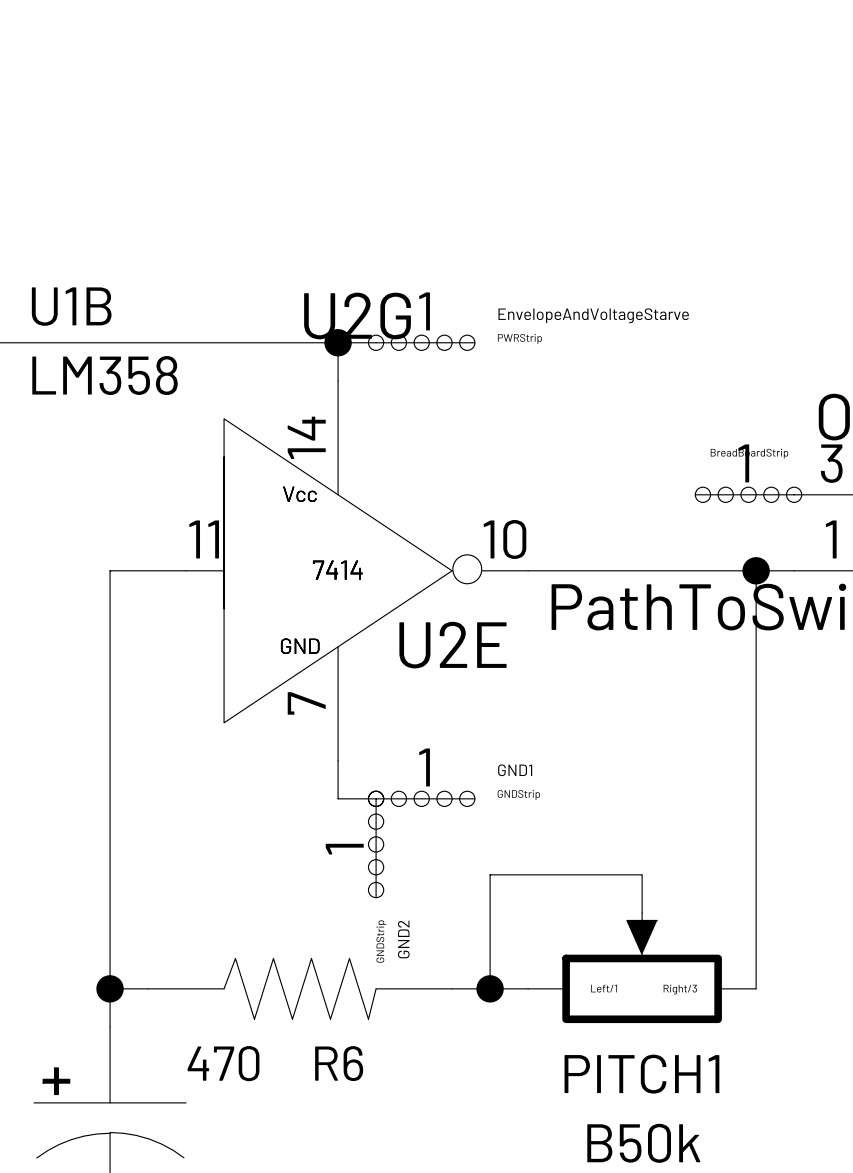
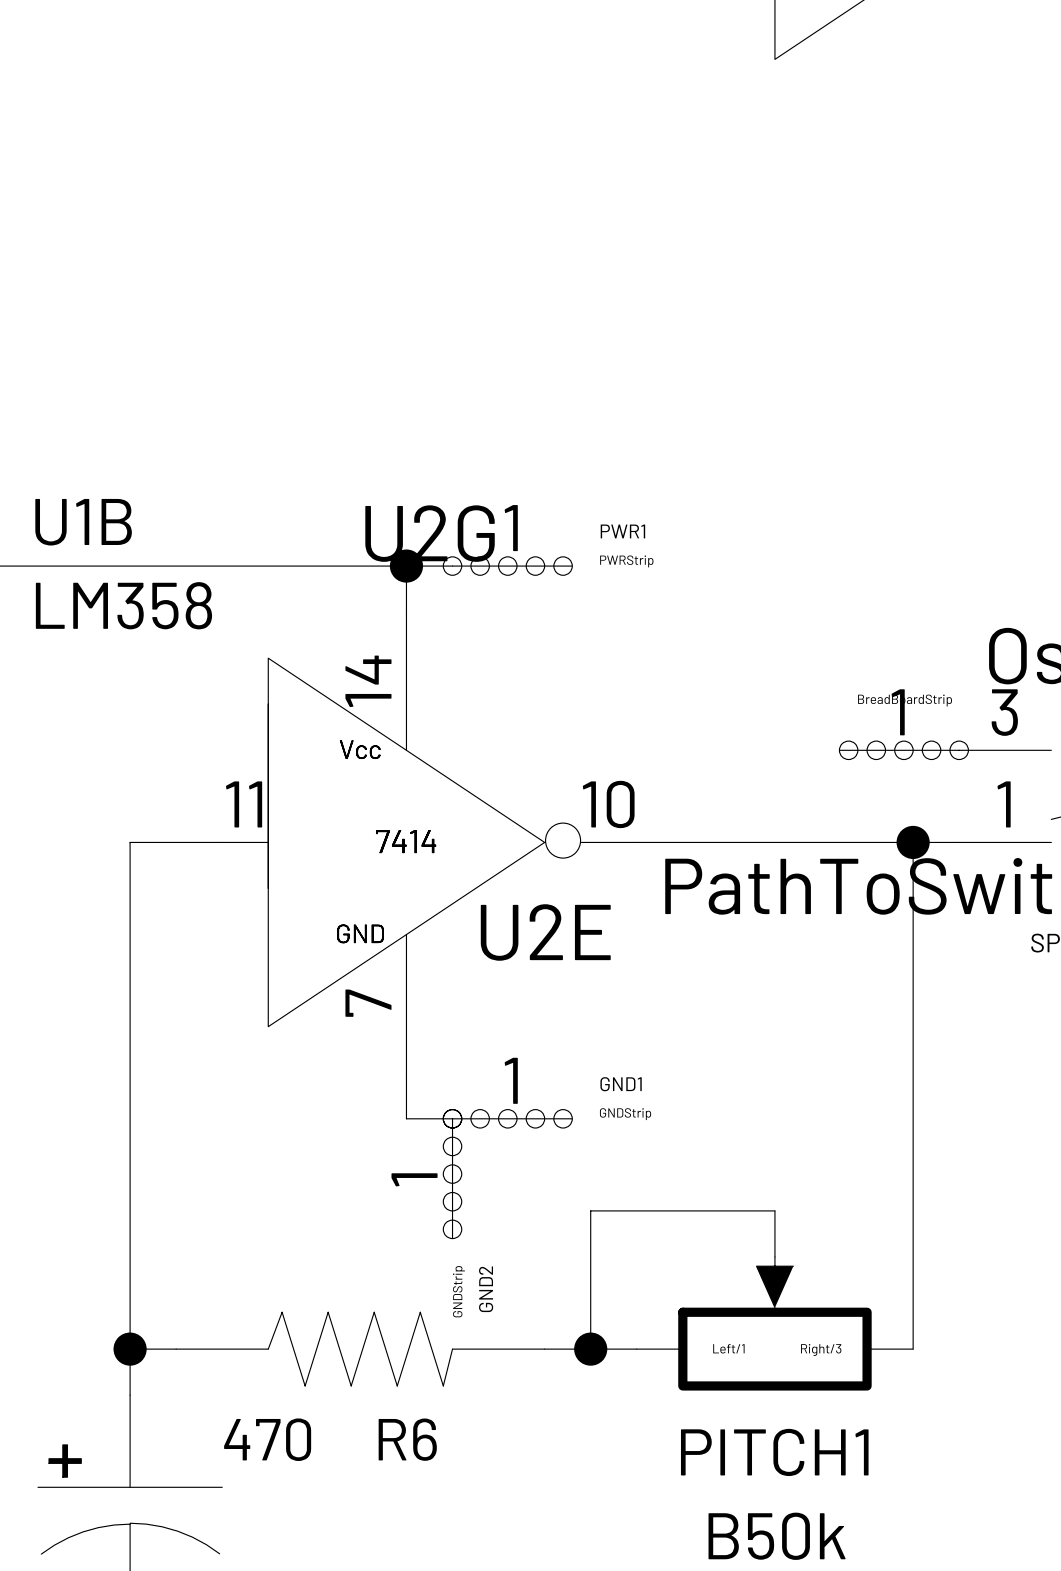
EnvelopeAndVoltageStarve name: EnvelopeAndVoltageStarve (593, 315) -> PWR1 (622, 531)

